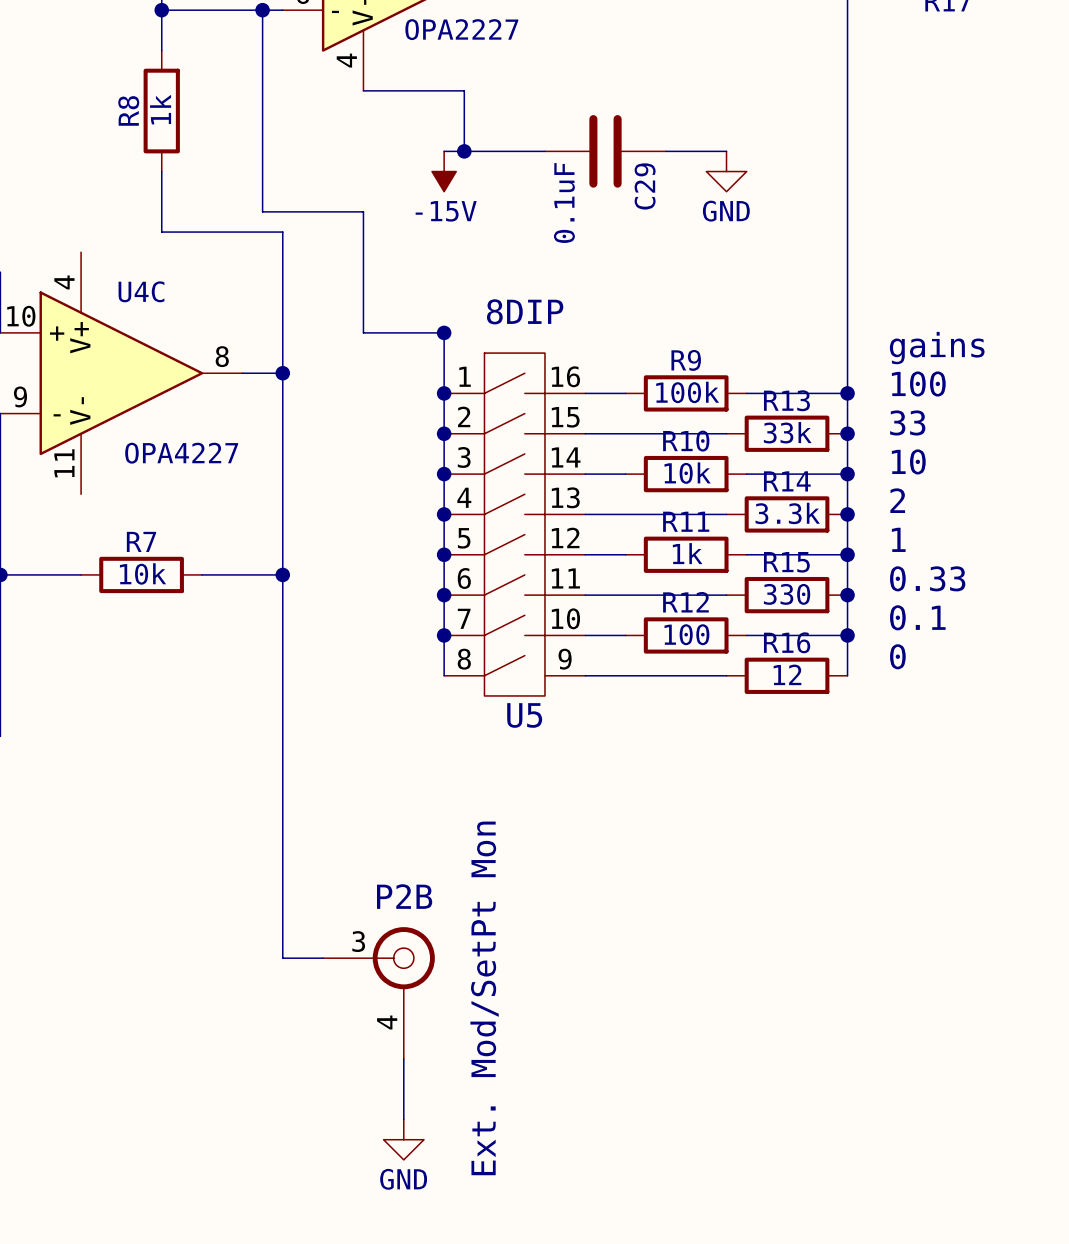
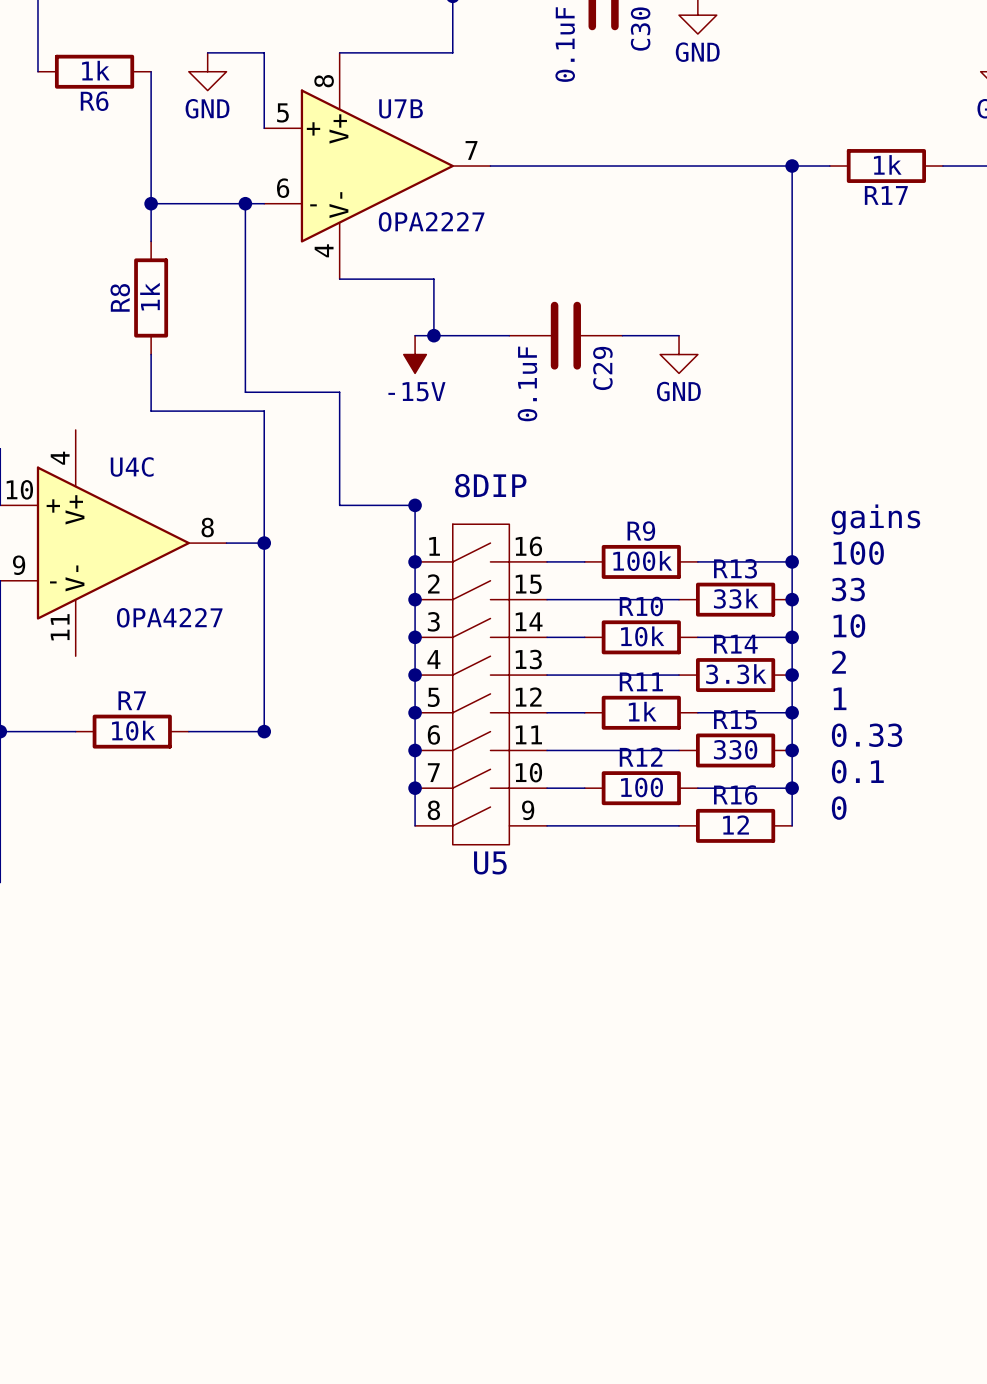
wire: (282, 574) (282, 958) (323, 958) -> none
P2B: Ext. Mod/SetPt Mon (378, 993) -> none
wire: (403, 1059) (403, 1119) -> none
power symbol: GND (403, 1139) -> none

